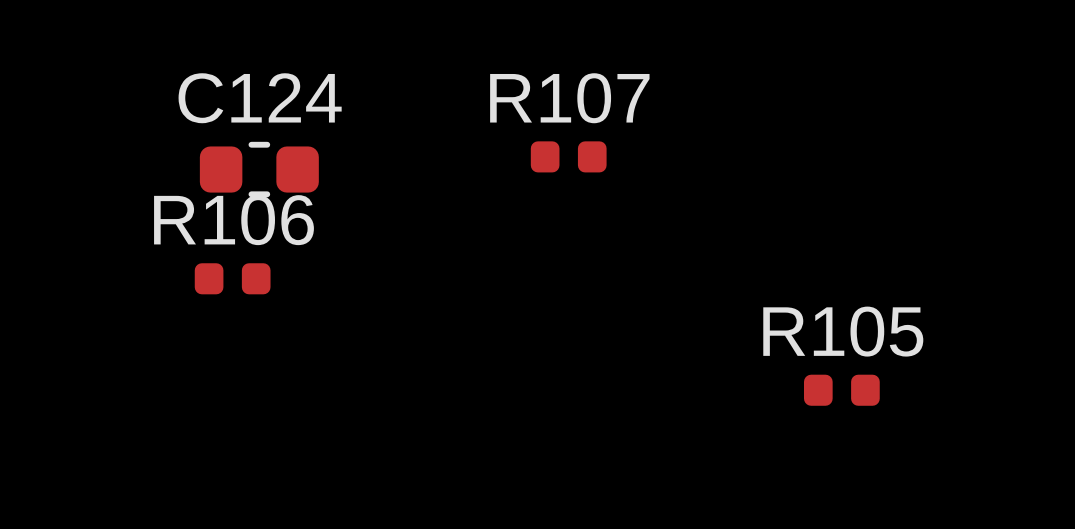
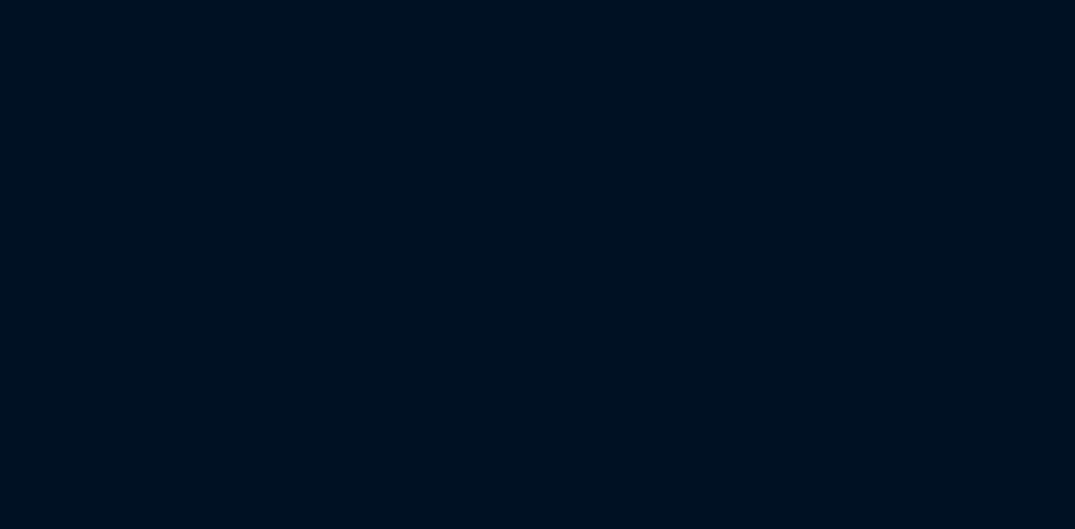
R107: (568, 156) -> none
C124: (259, 169) -> none
R106: (232, 278) -> none
R105: (841, 390) -> none

